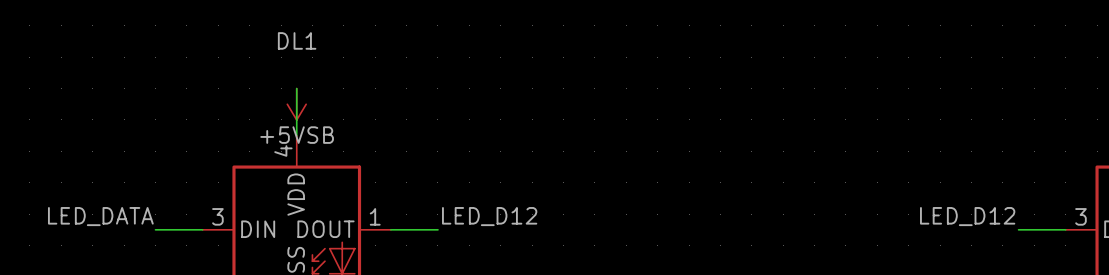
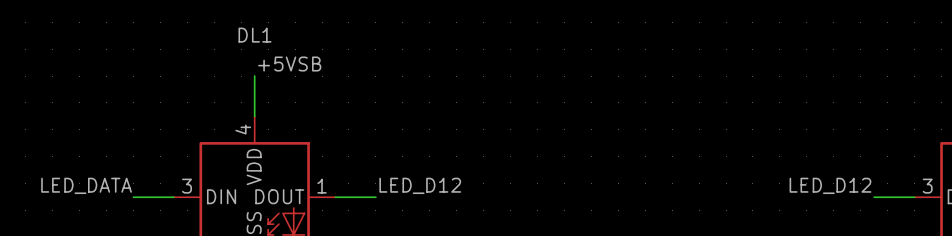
label: none -> +5VSB (289, 64)
power symbol: +5VSB (296, 104) -> none

